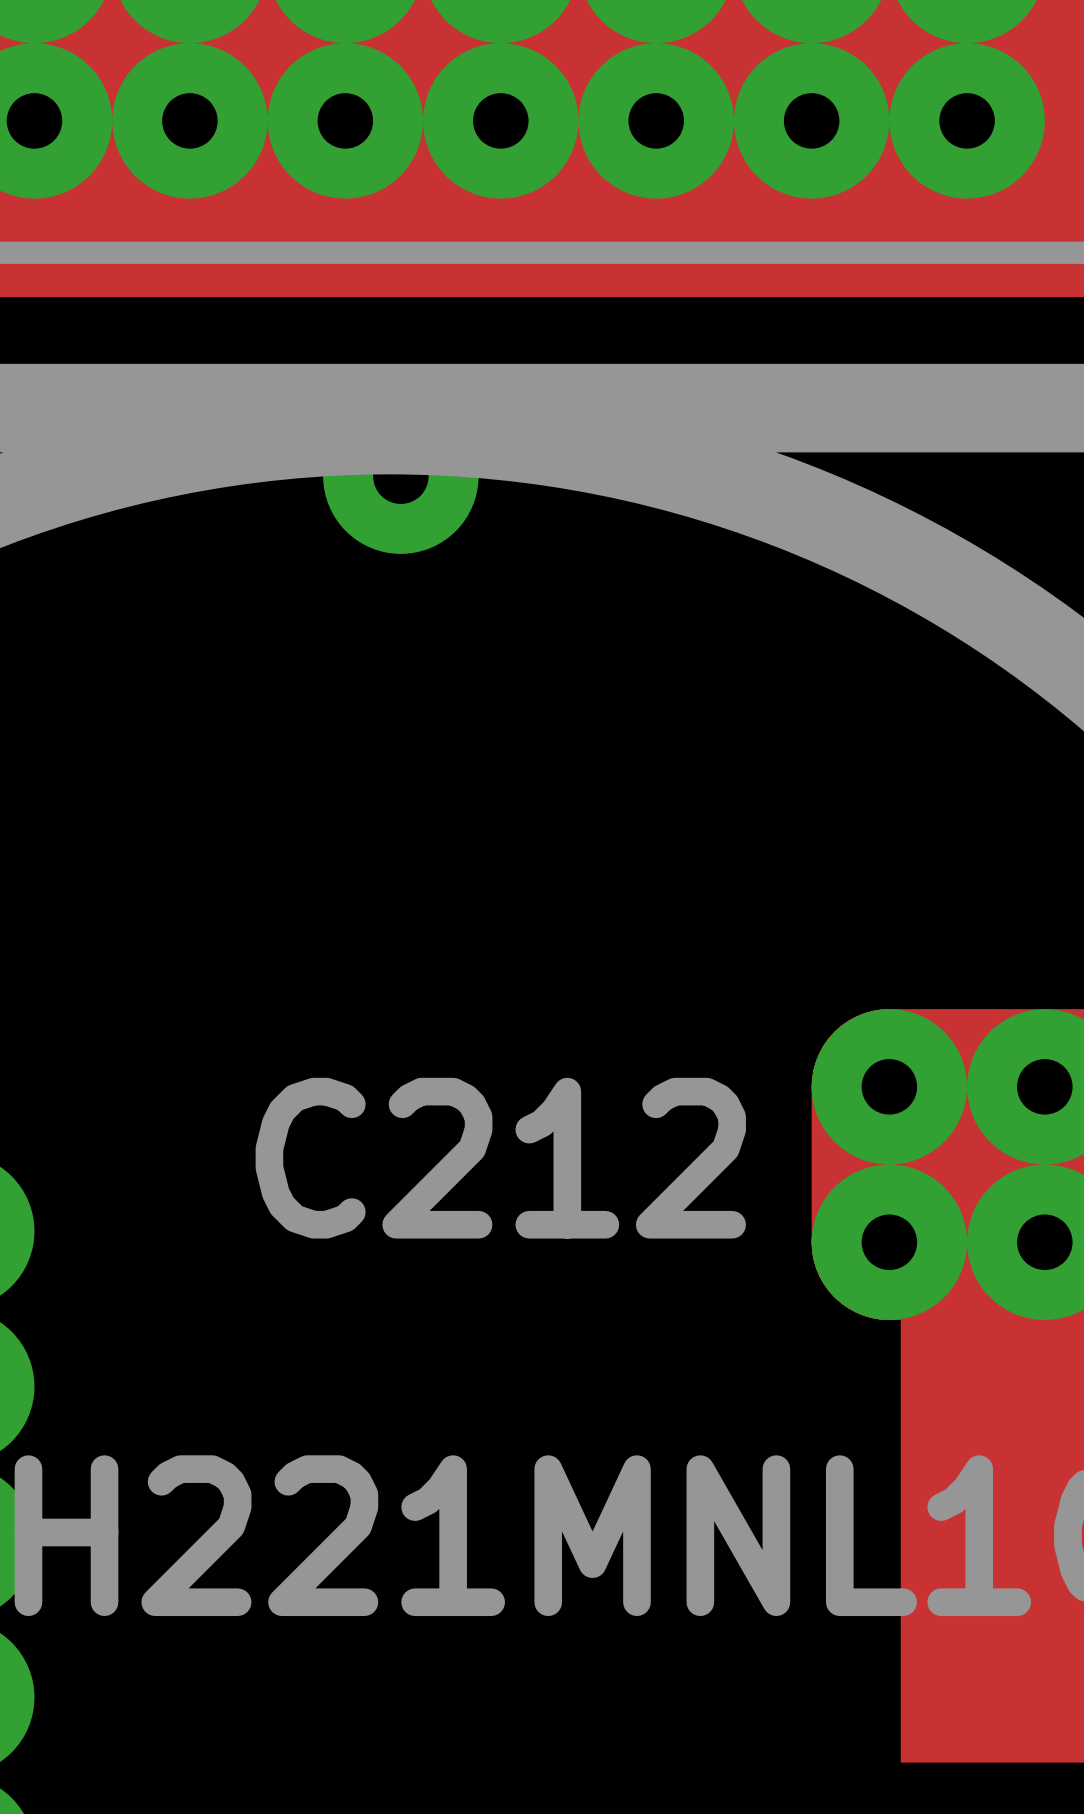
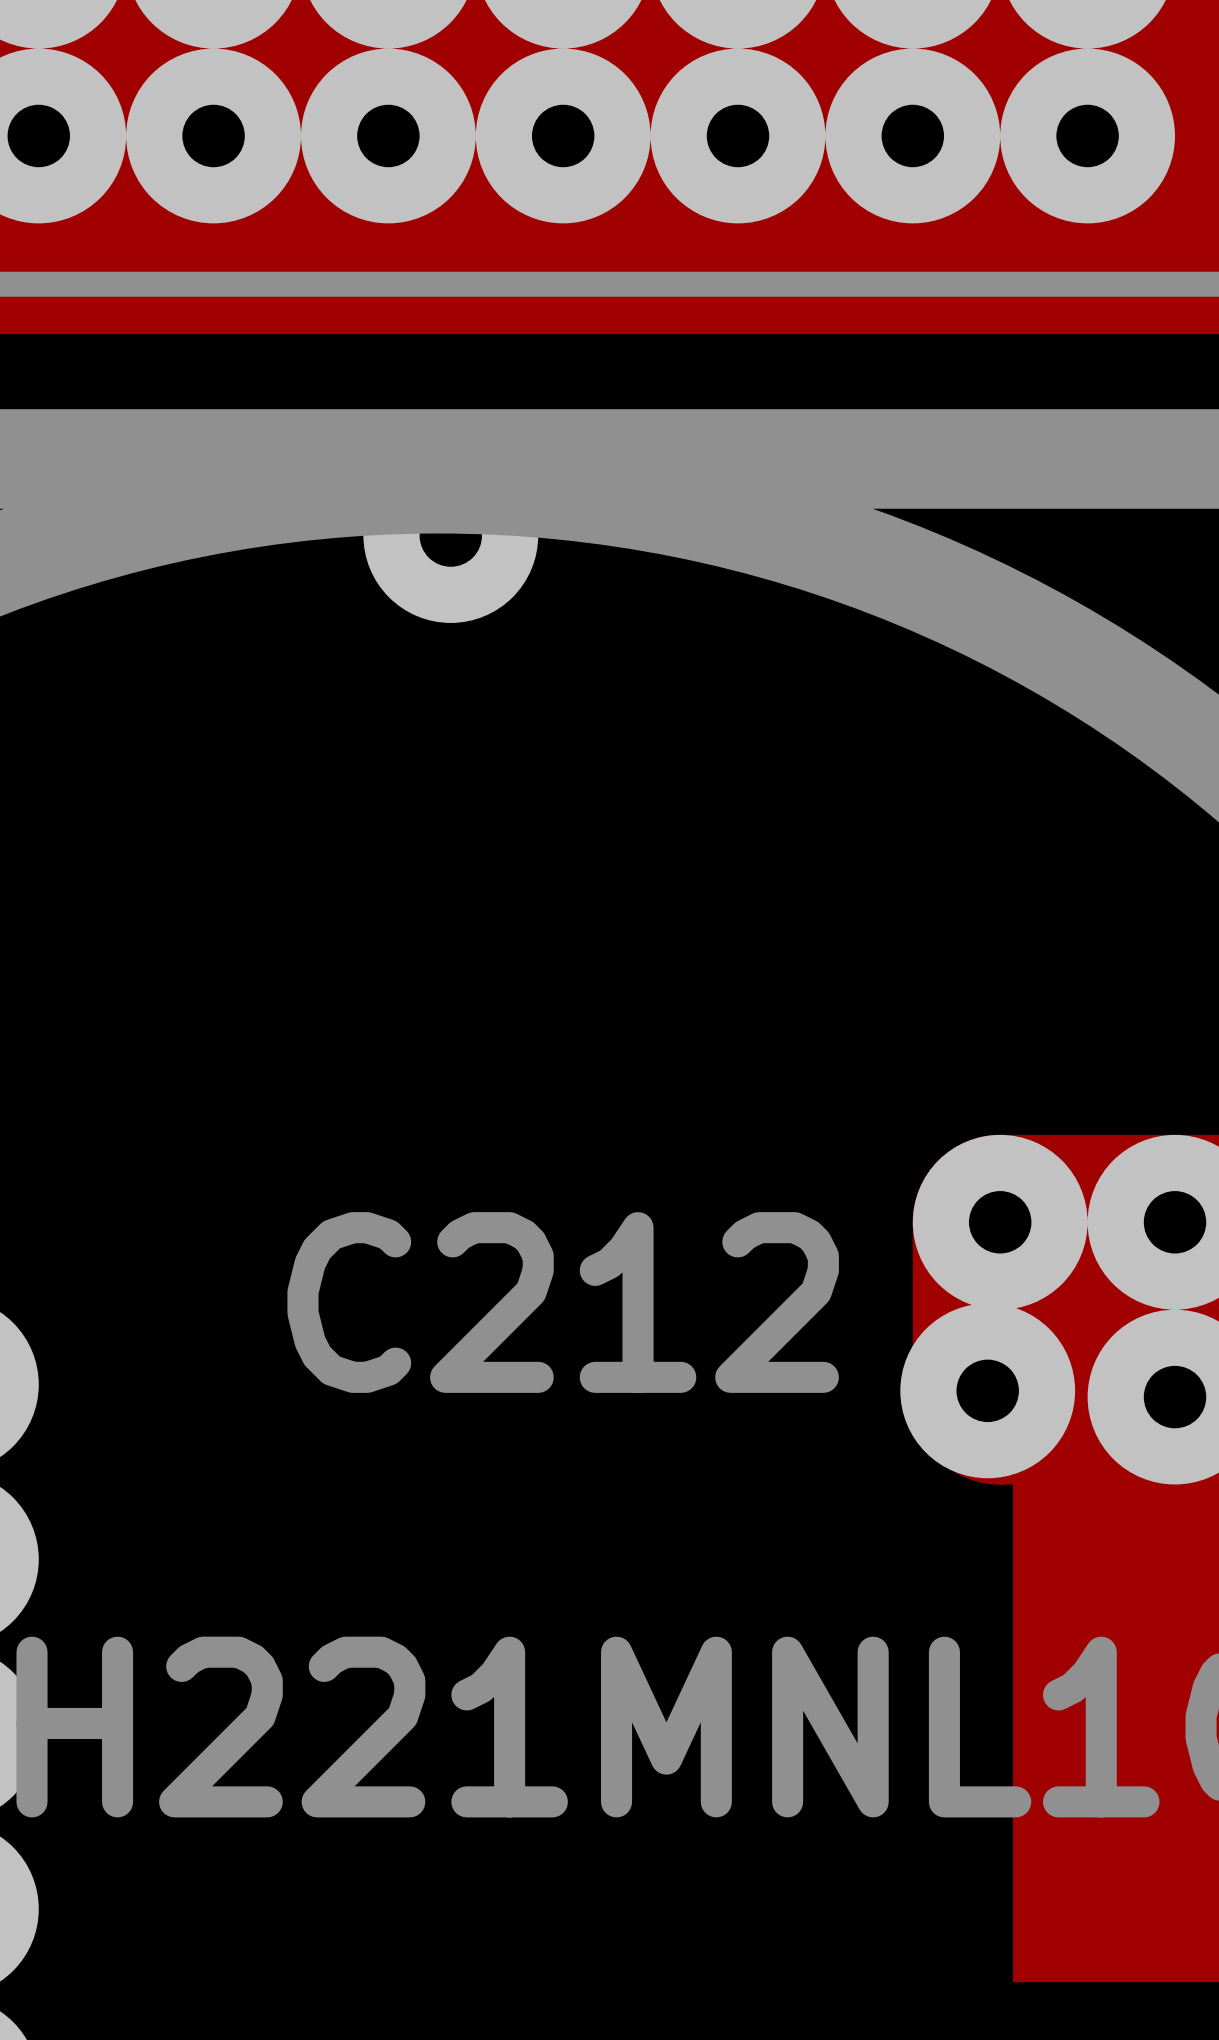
via position: (889, 1242) -> (987, 1390)

